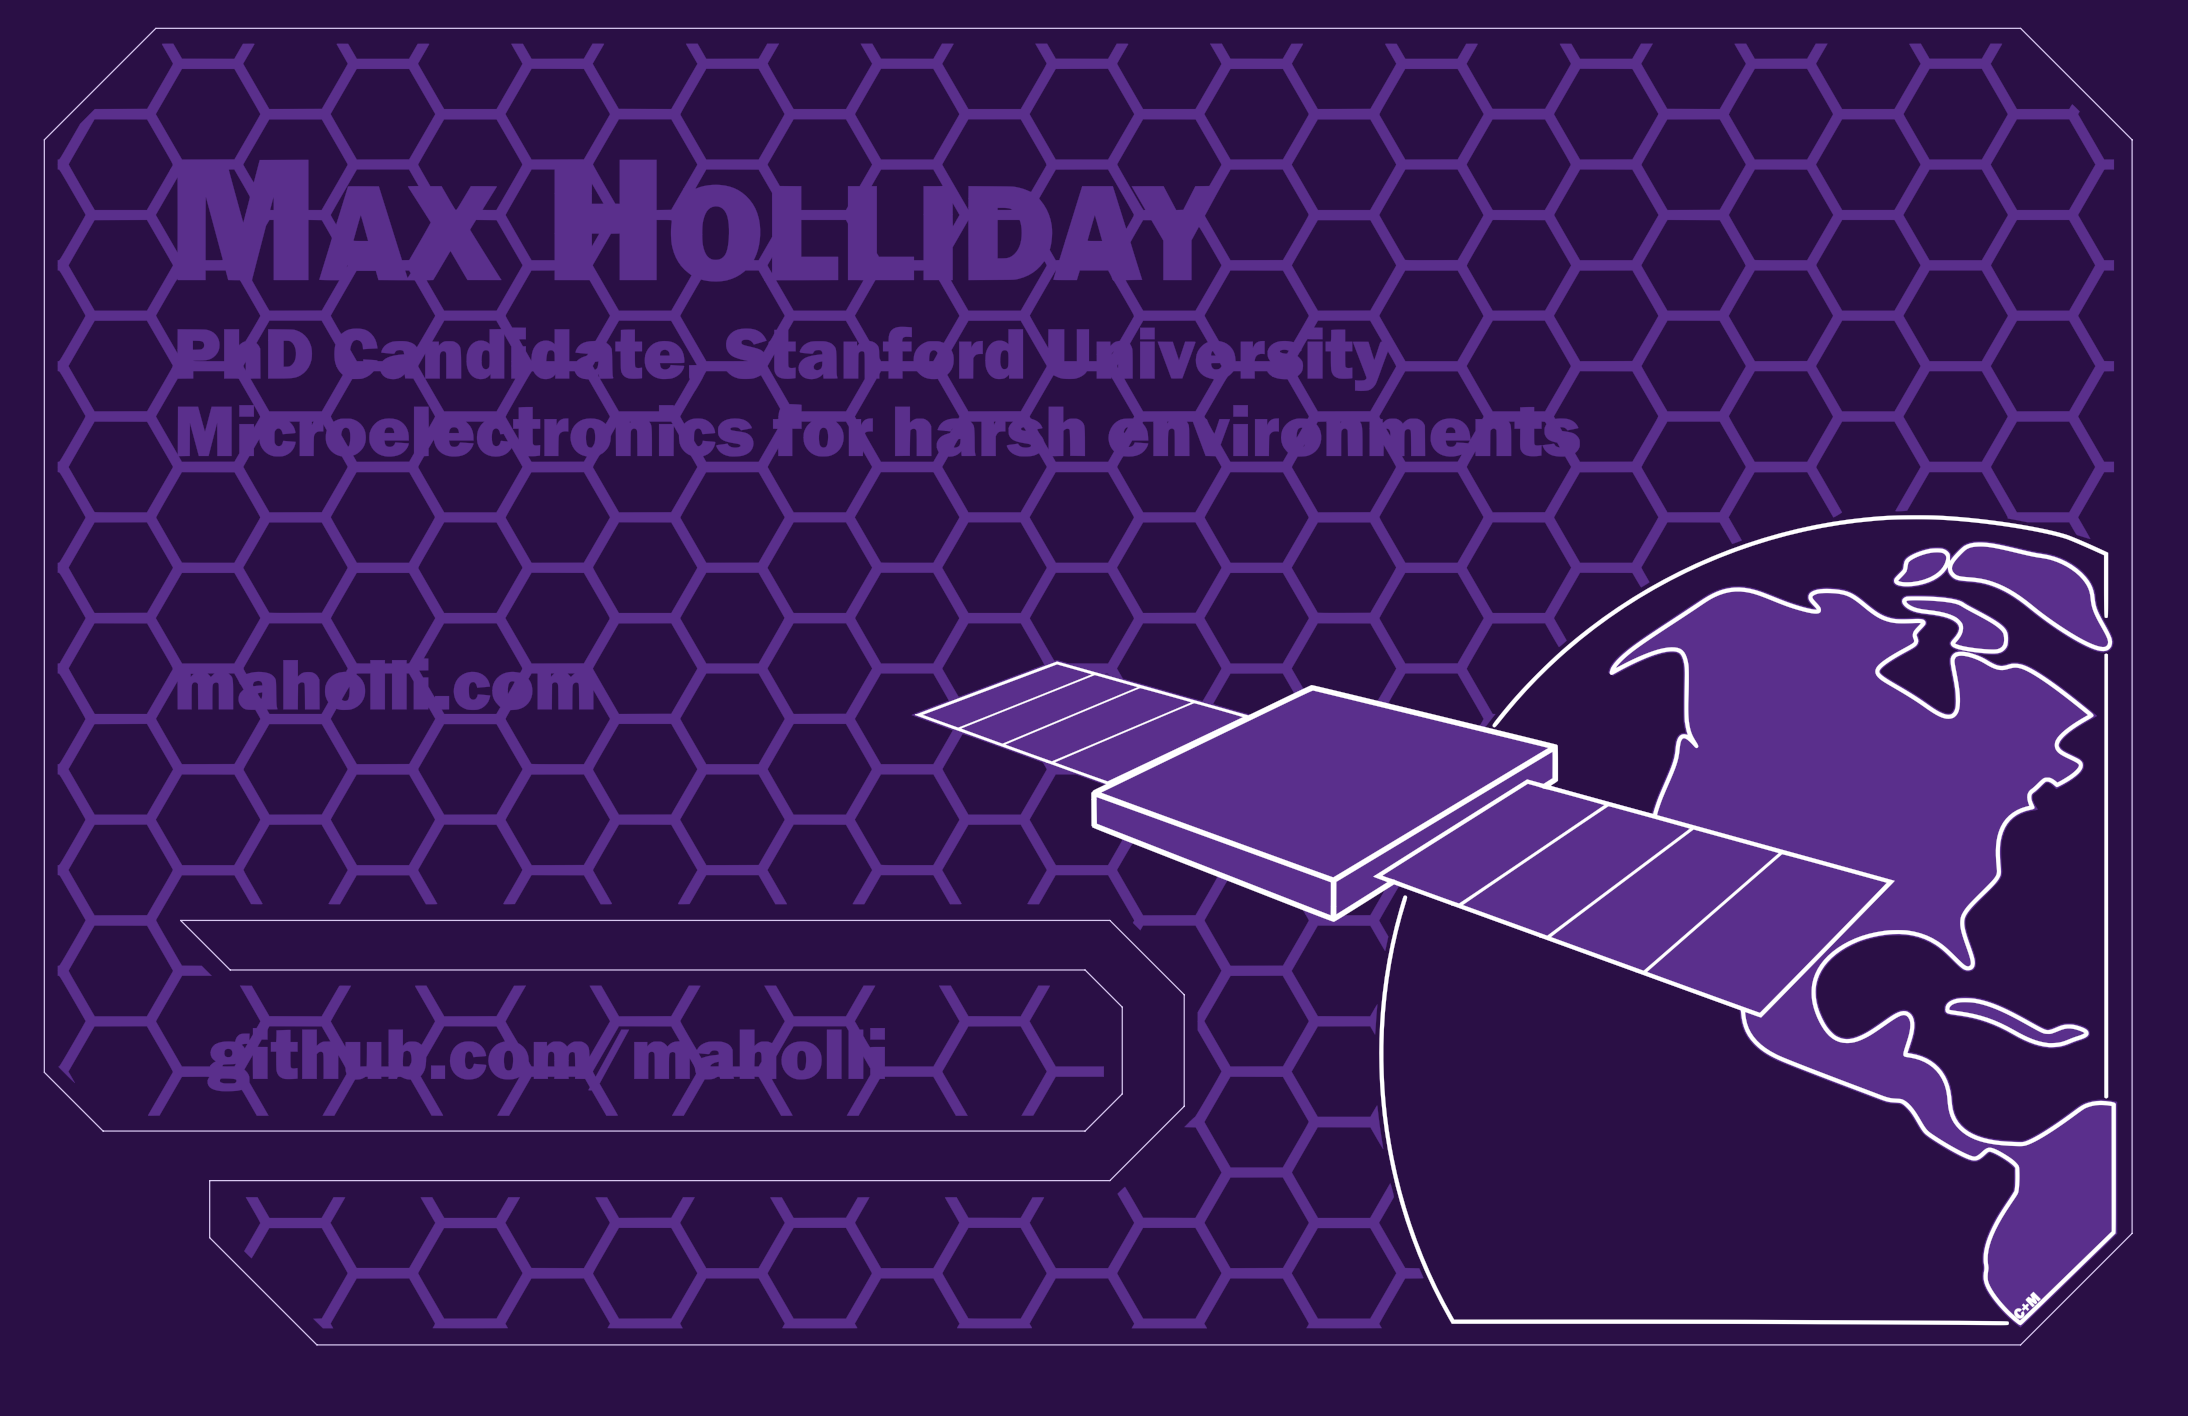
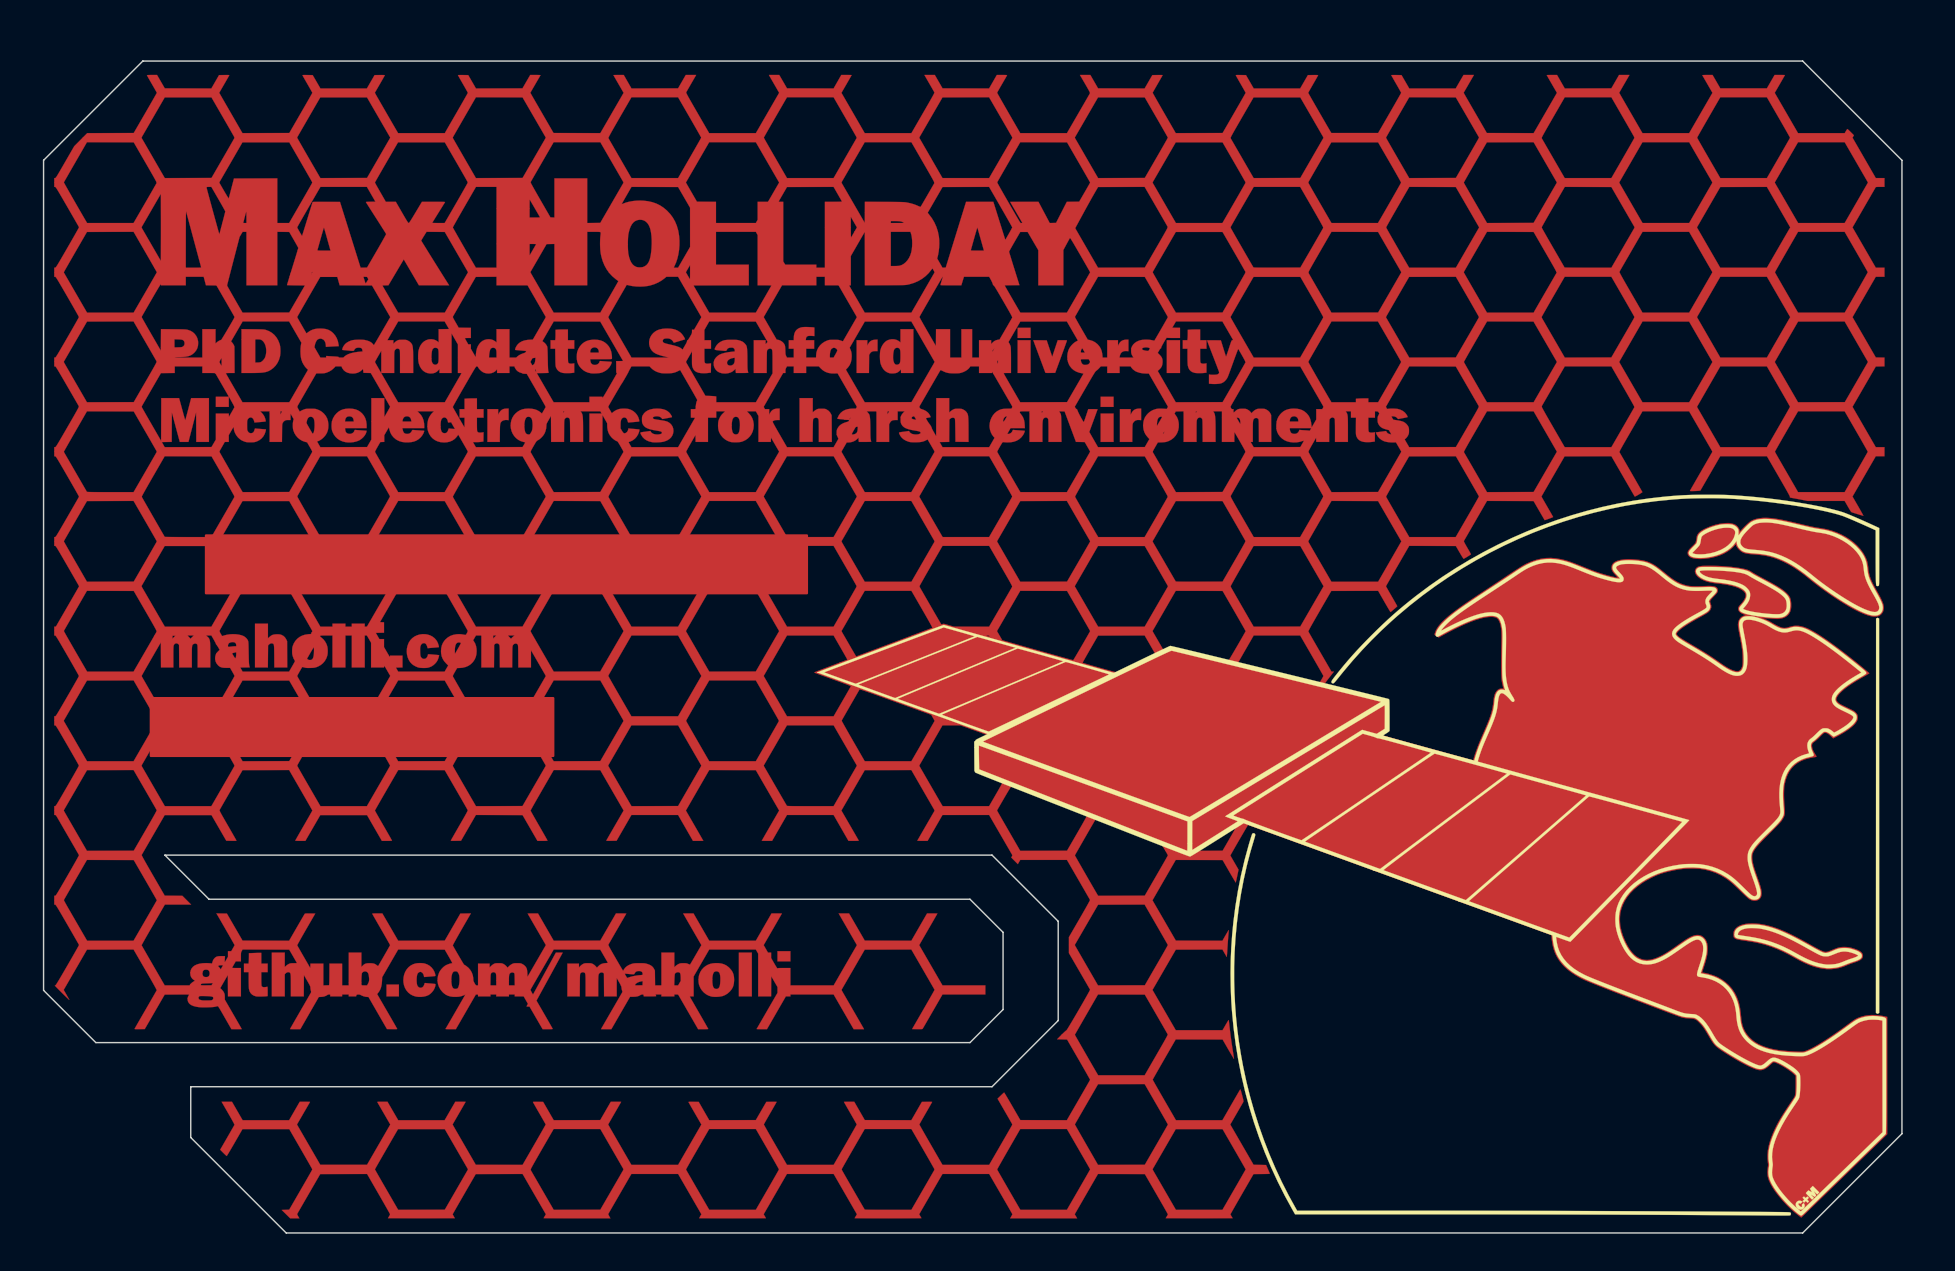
drawing shape: [57, 43, 2118, 1329] -> [54, 74, 1888, 1219]
drawing: none -> [817, 494, 1887, 1216]

